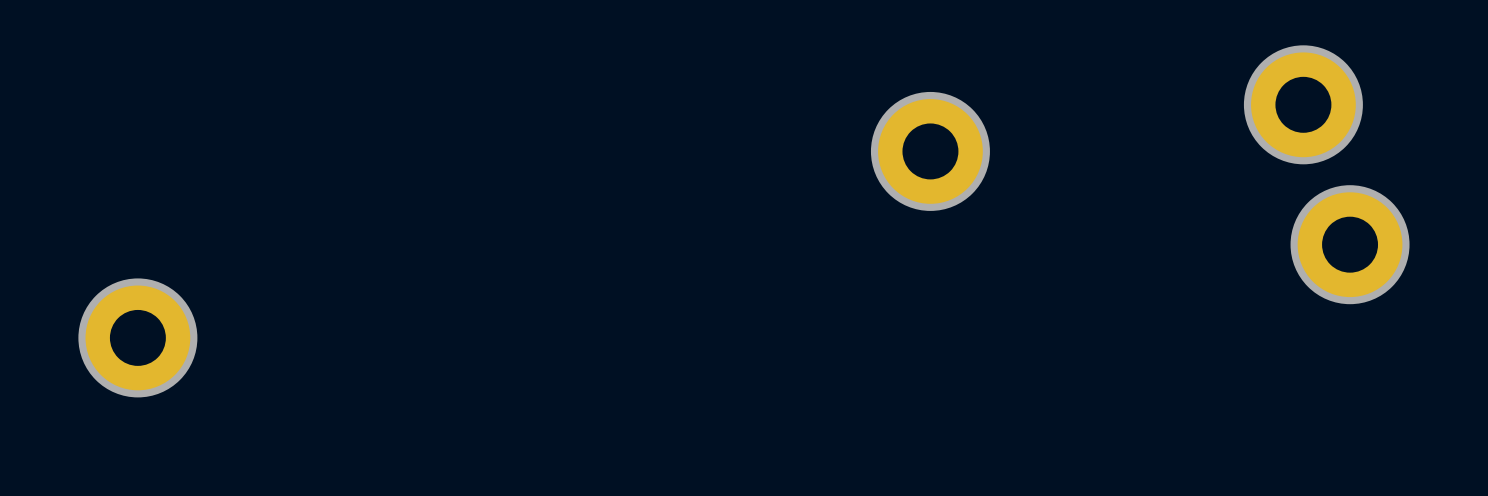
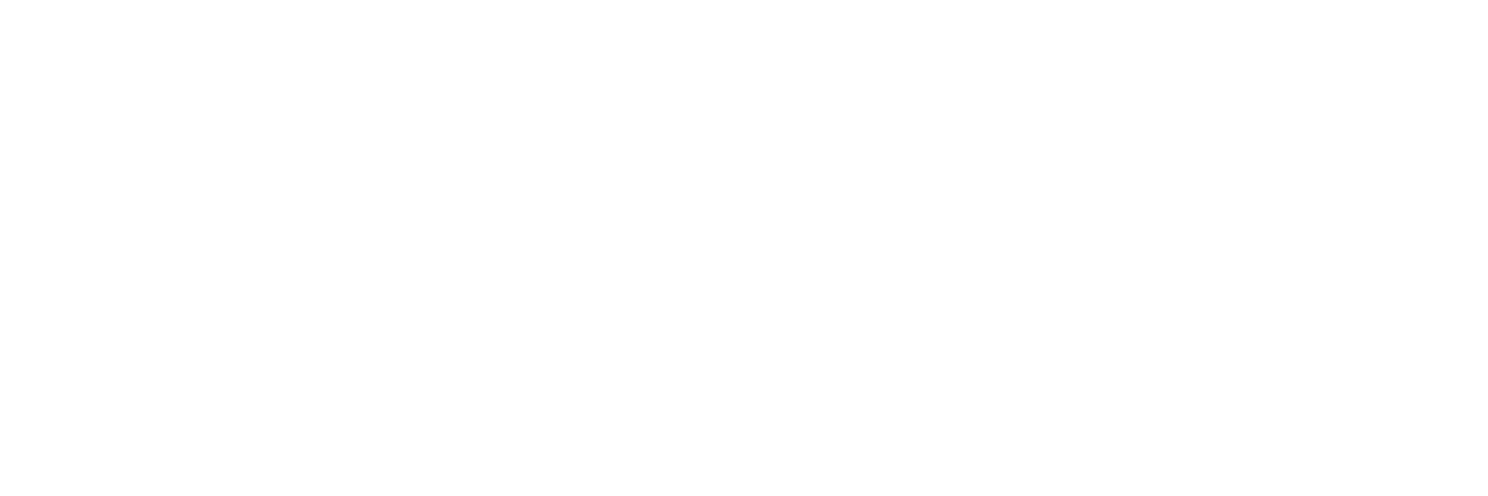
part: (1303, 104) -> none
part: (930, 151) -> none
part: (1350, 244) -> none
part: (137, 337) -> none

